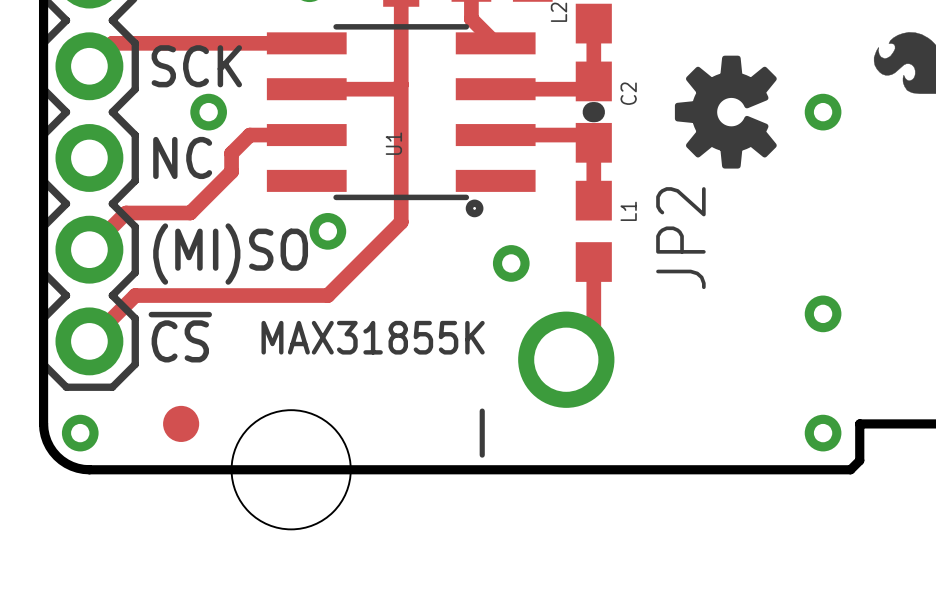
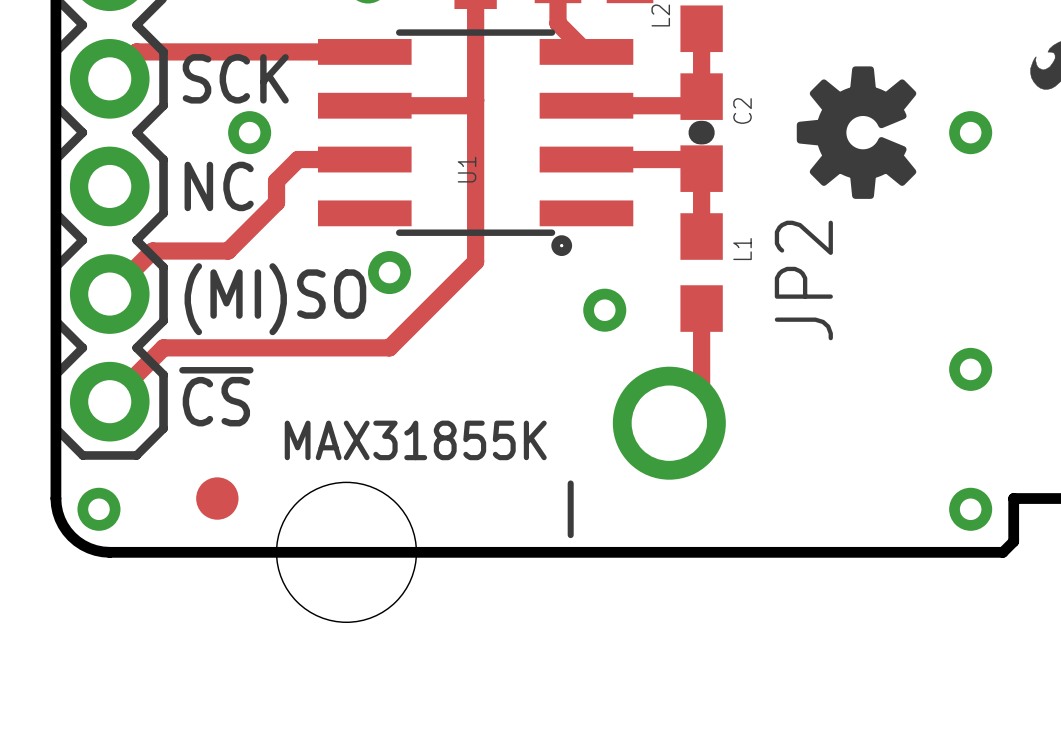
text position: MAX31855K (373, 337) -> MAX31855K (415, 440)

